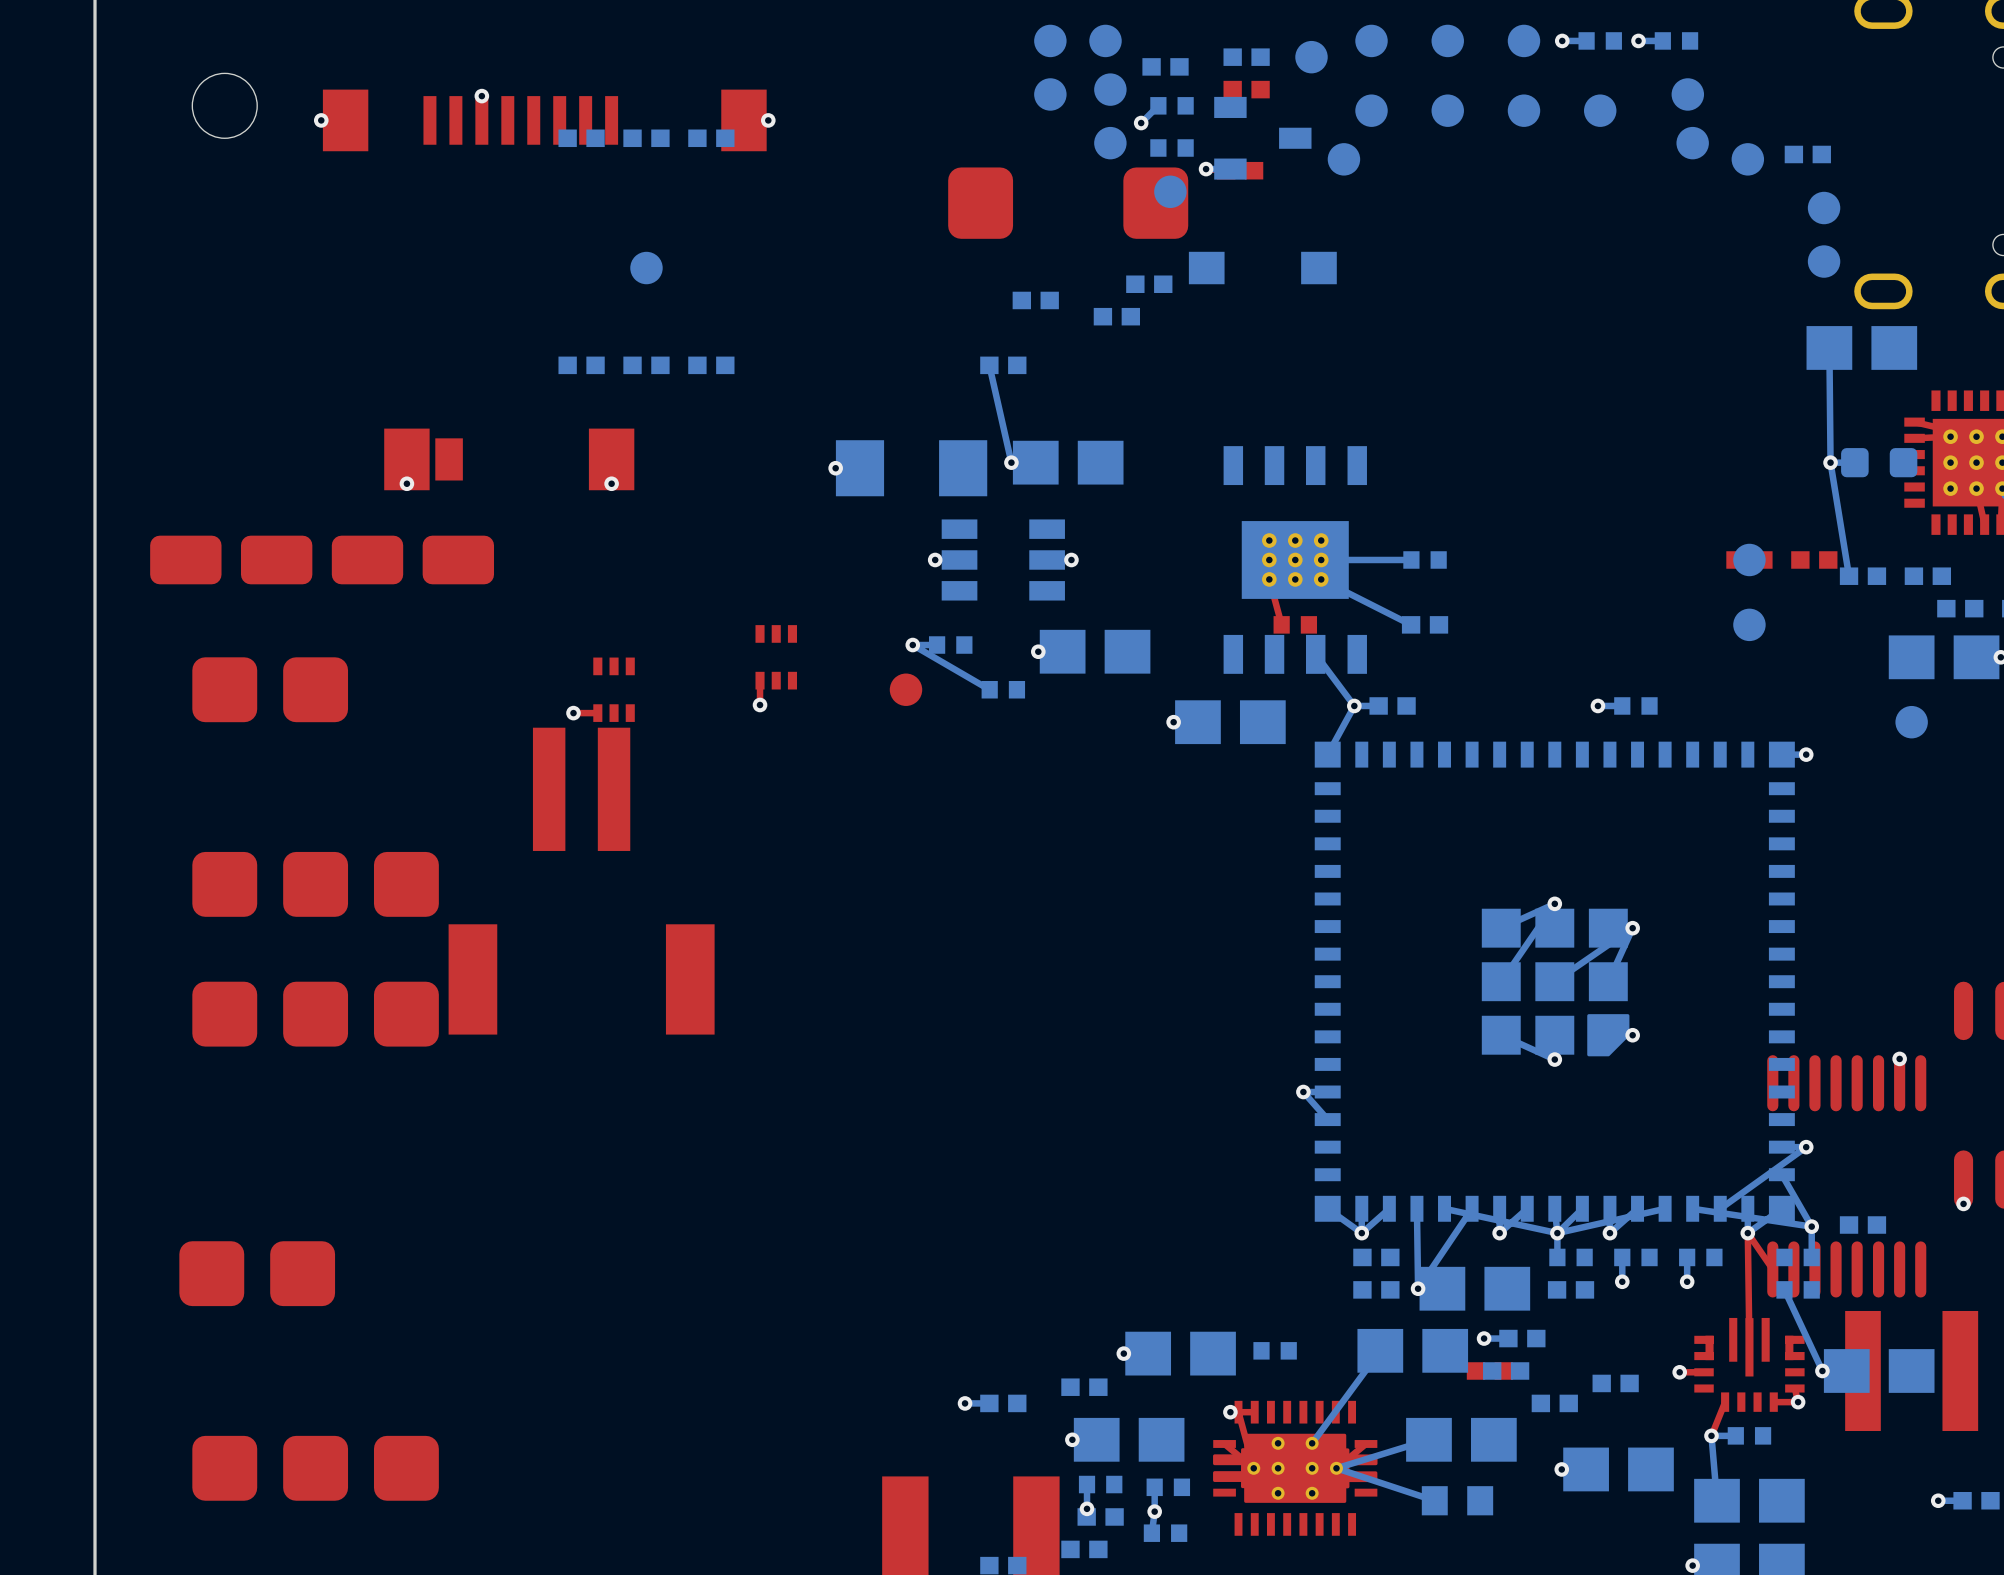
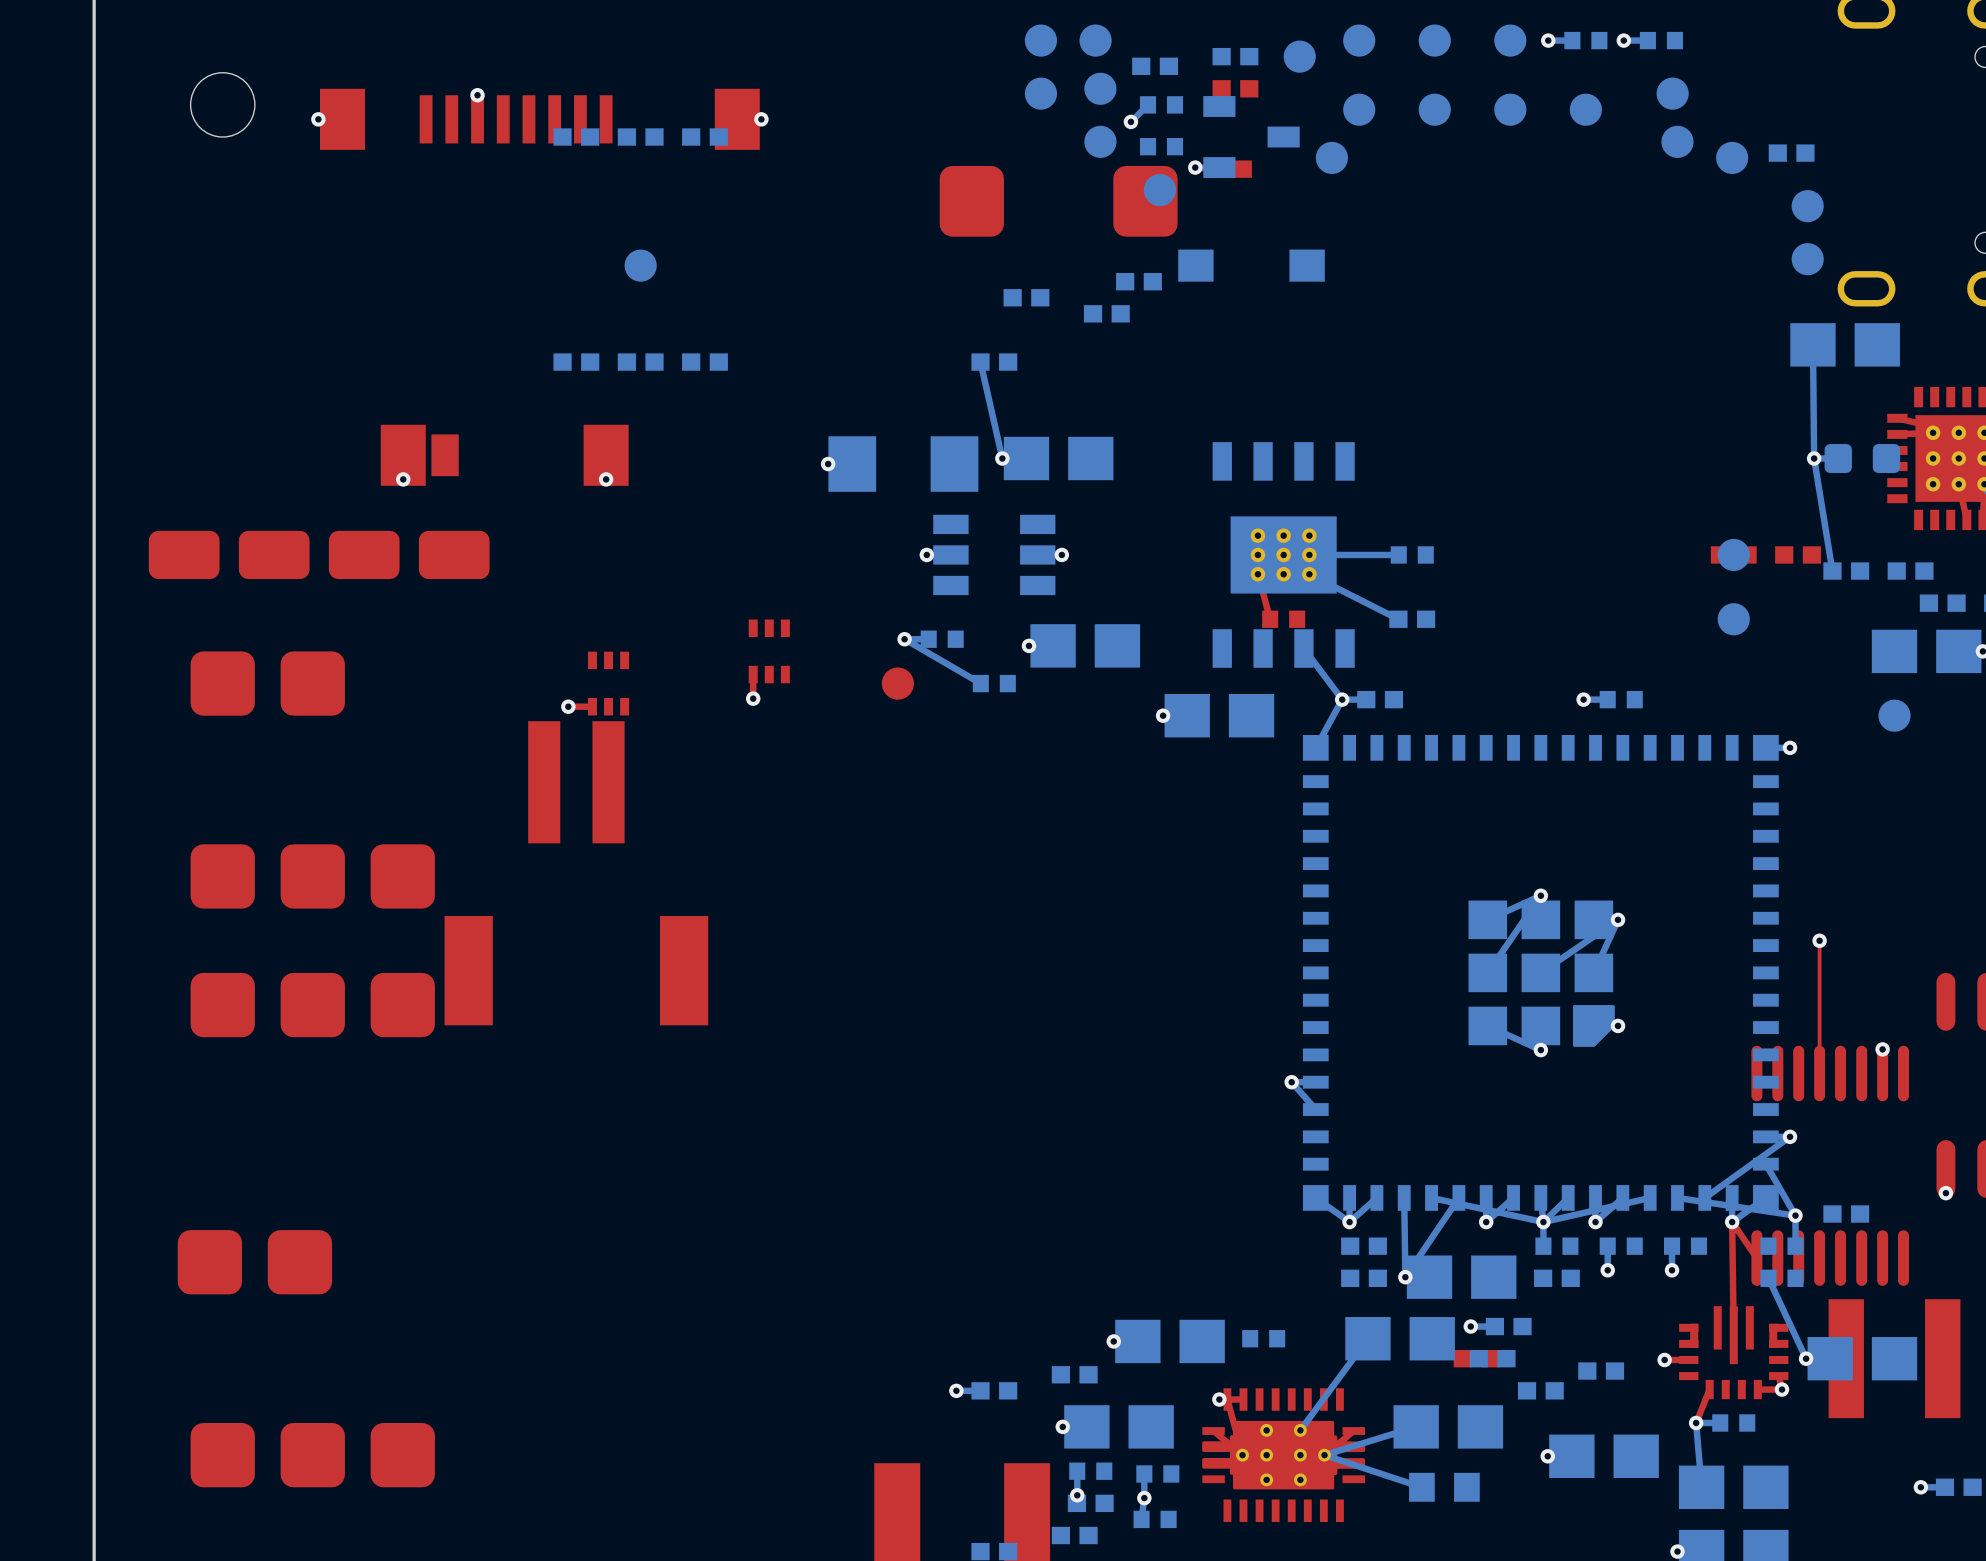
top track: none -> (1819, 940) (1819, 1073)
via: none -> (1819, 940)

